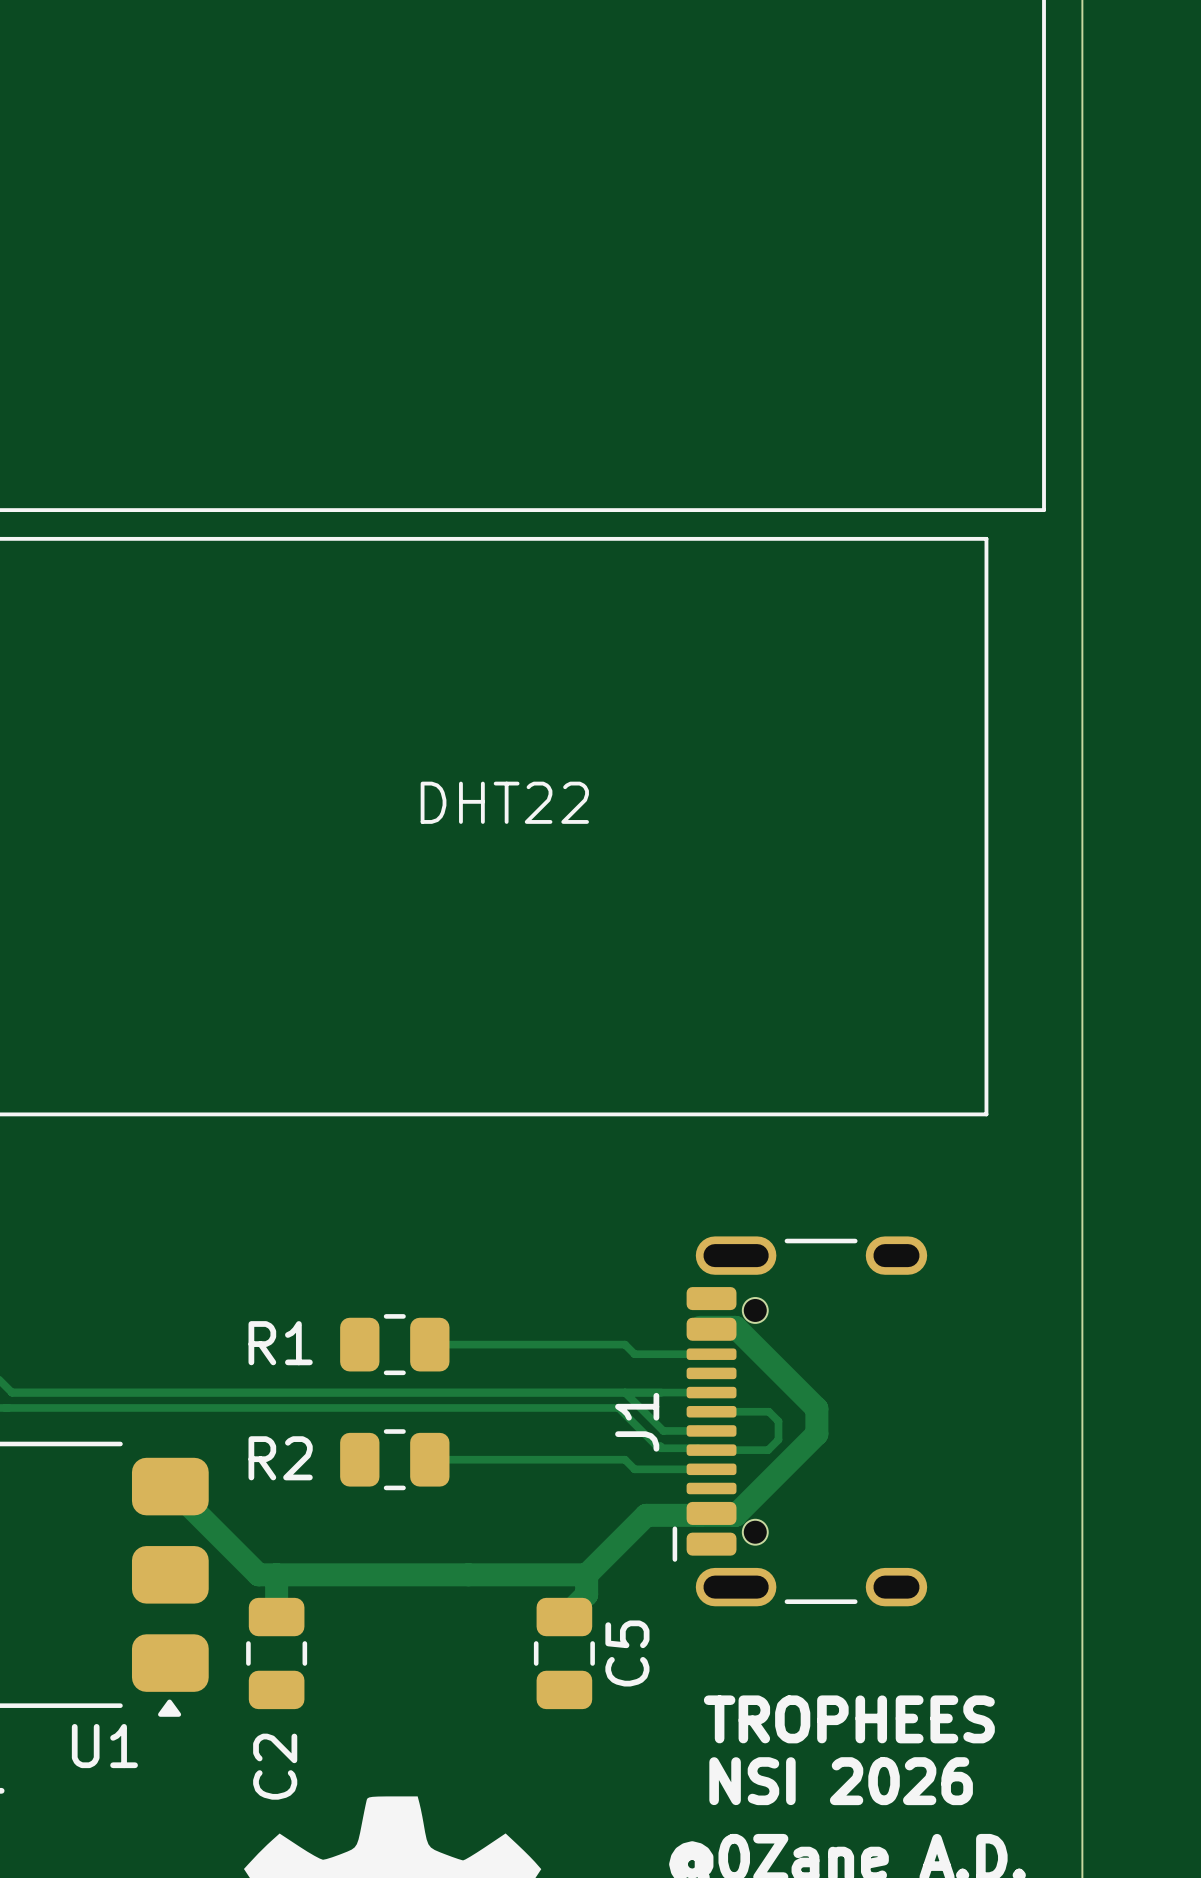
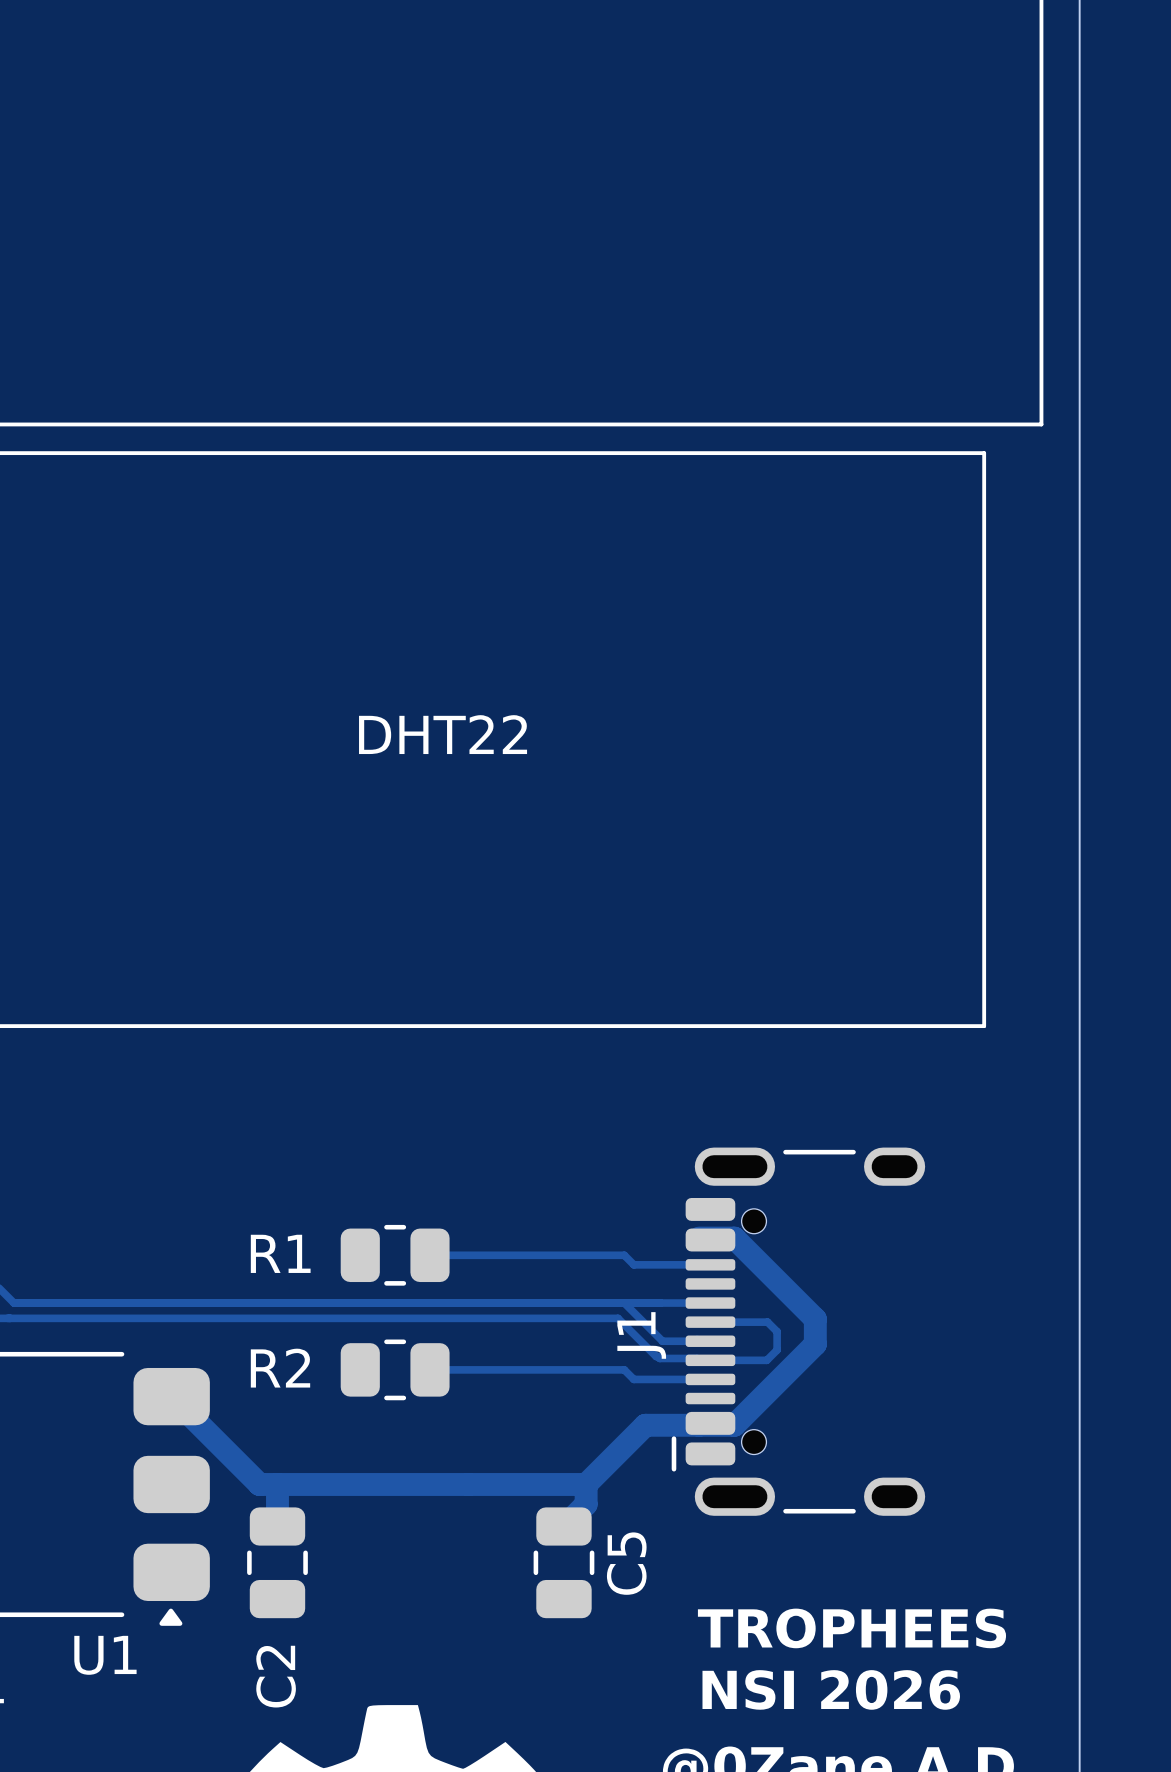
text position: DHT22 (504, 802) -> DHT22 (443, 734)

